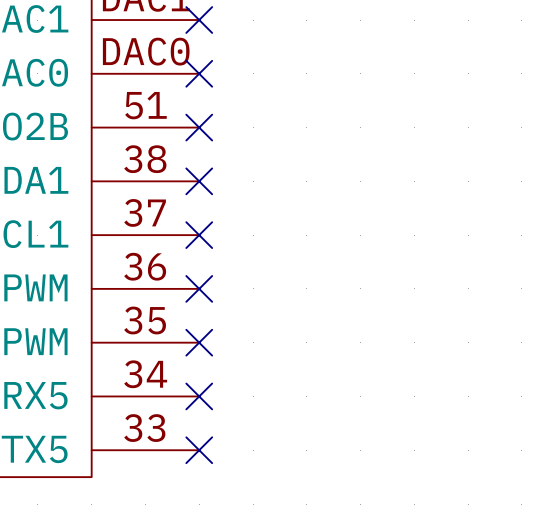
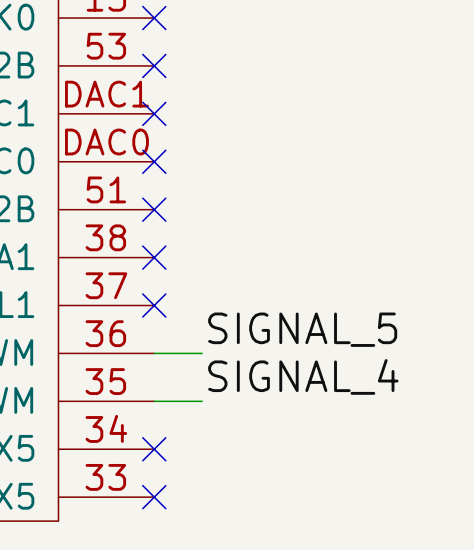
label: none -> SIGNAL_5 (302, 329)
wire: none -> (154, 353) (202, 353)
no-connect mark: (199, 288) -> none
label: none -> SIGNAL_4 (303, 376)
wire: none -> (154, 401) (202, 401)
no-connect mark: (199, 342) -> none

